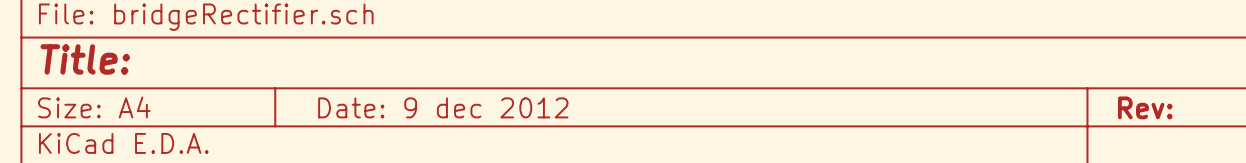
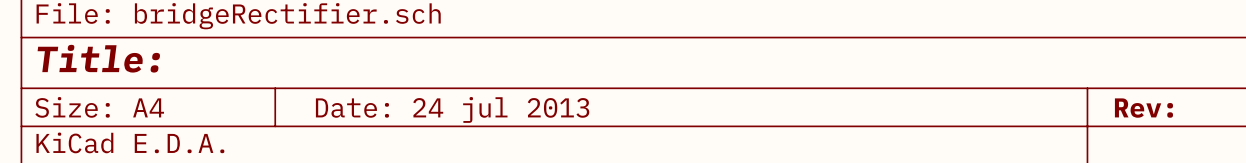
title block: Date: 9 dec 2012 (443, 107) -> Date: 24 jul 2013 (452, 109)

